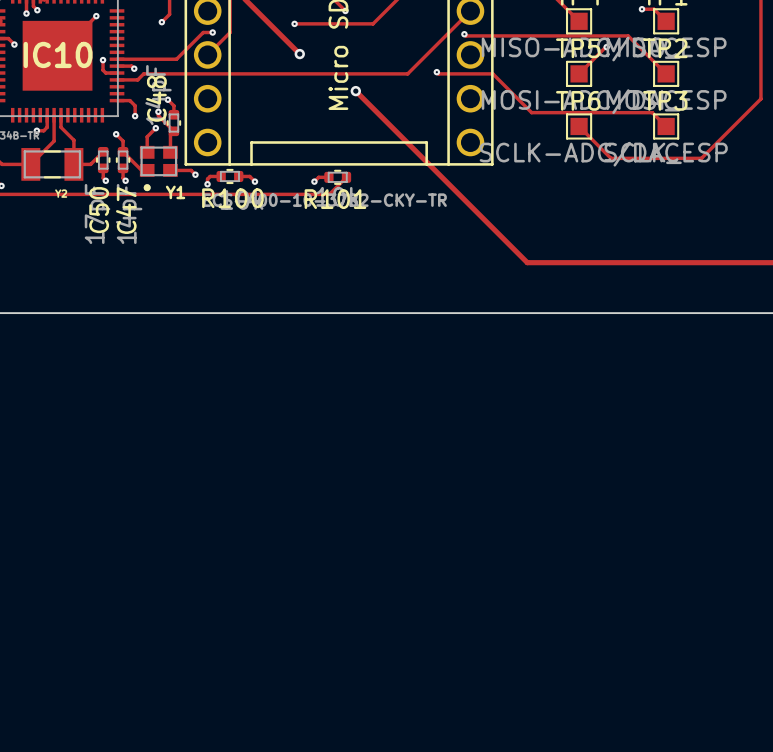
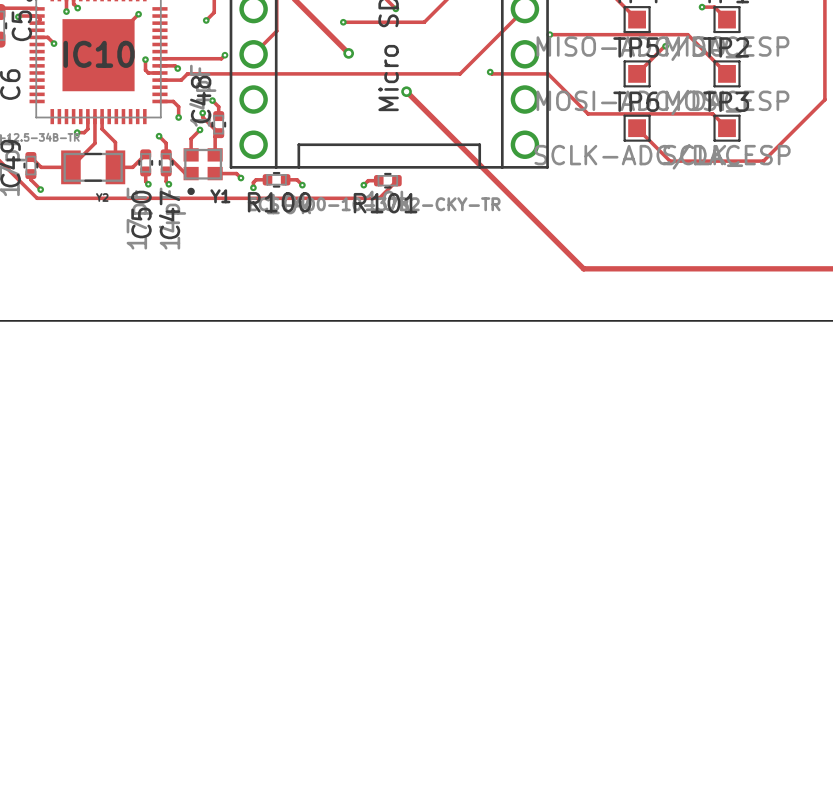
track: (212, 32) (203, 32) (179, 55) -> none
via: (212, 32) -> none
track: (464, 34) (466, 35) (494, 35) -> none
via: (464, 34) -> none
via: none -> (549, 34)
via: none -> (224, 55)

